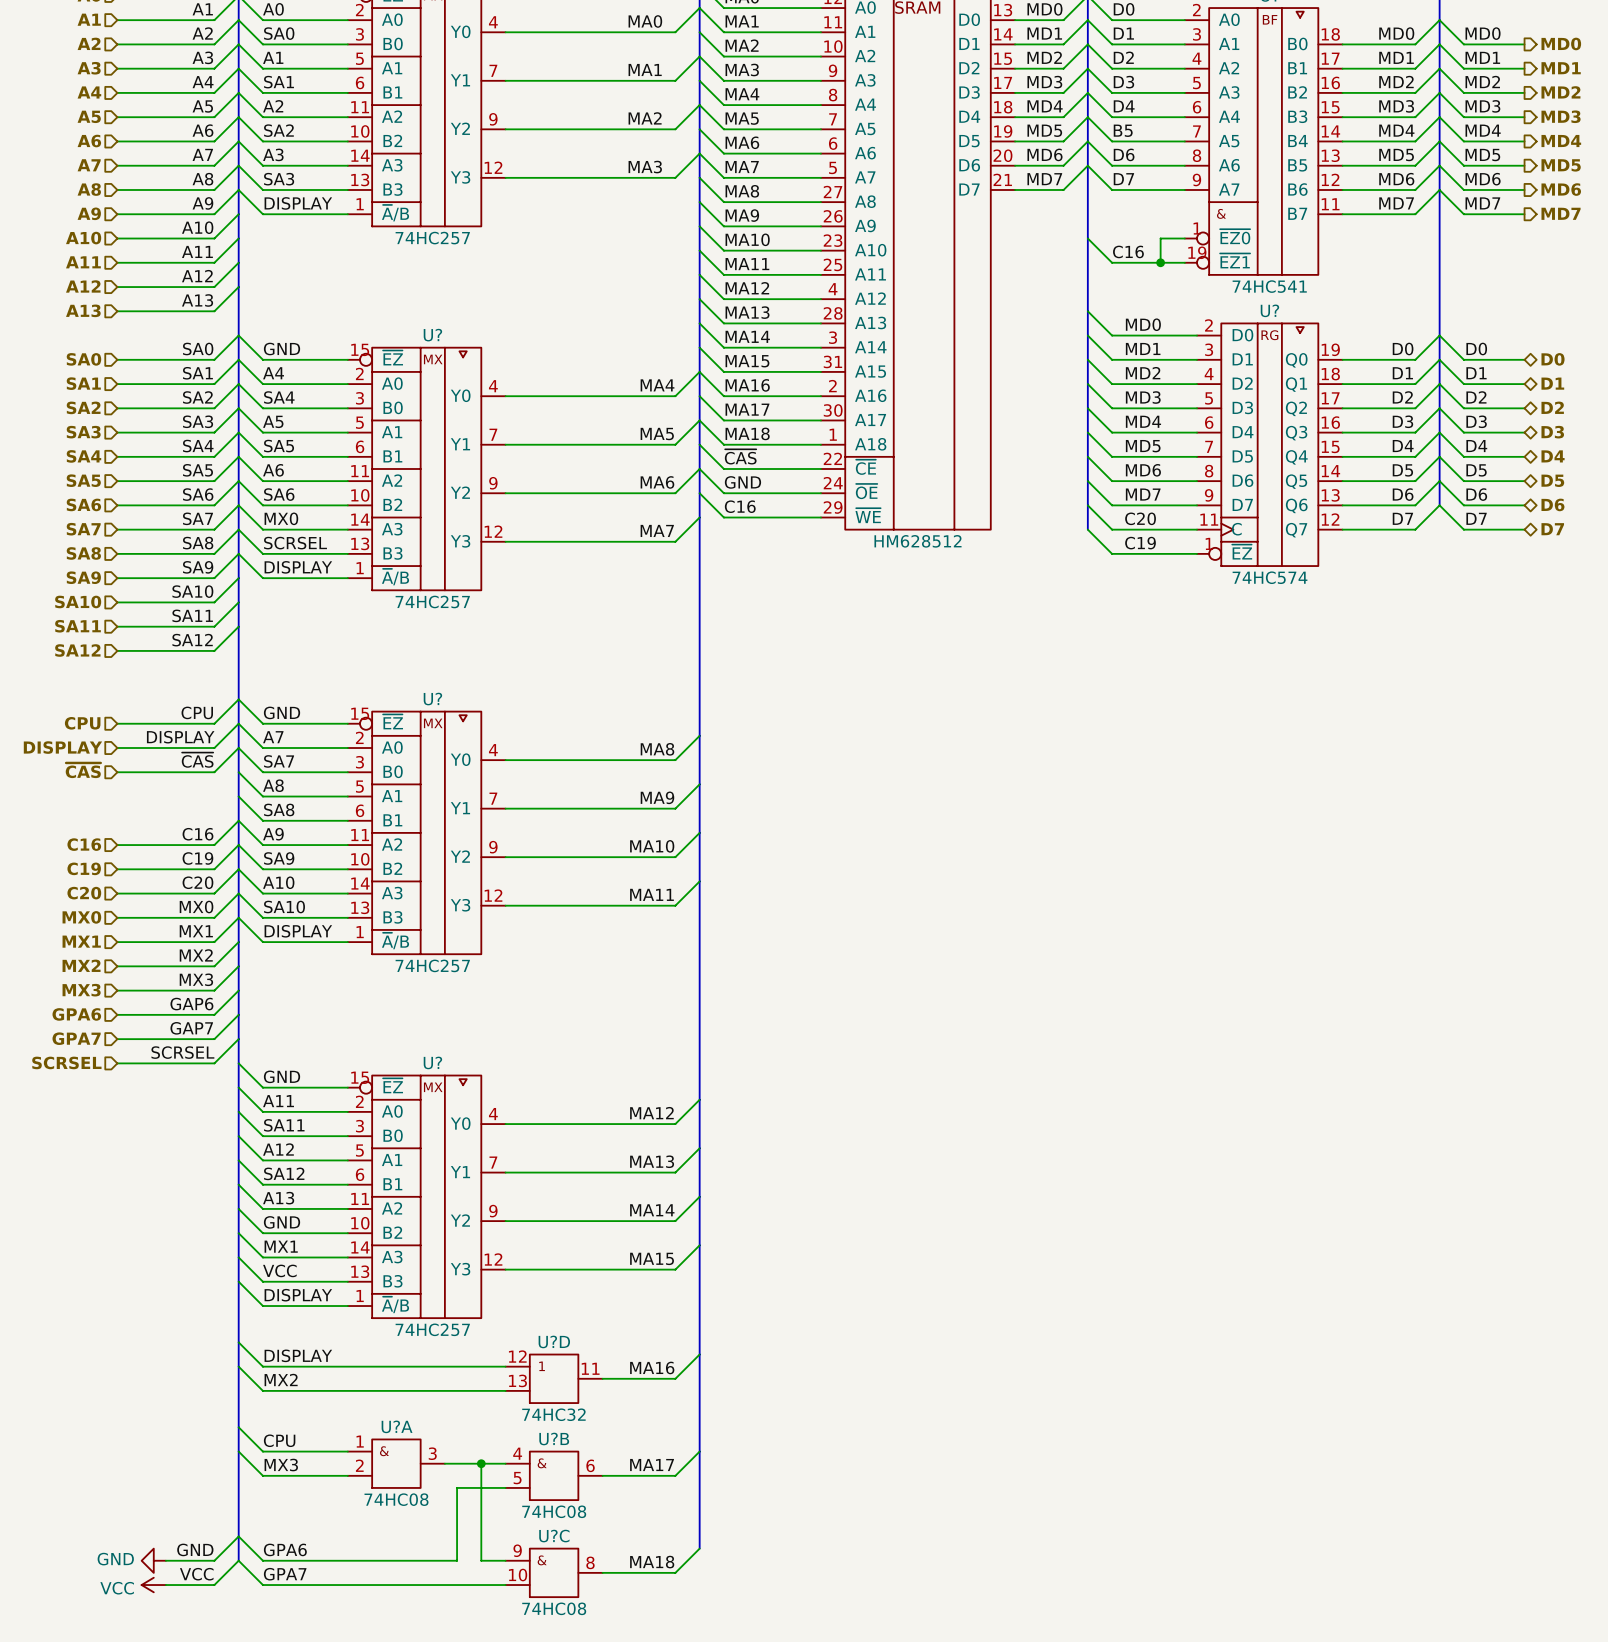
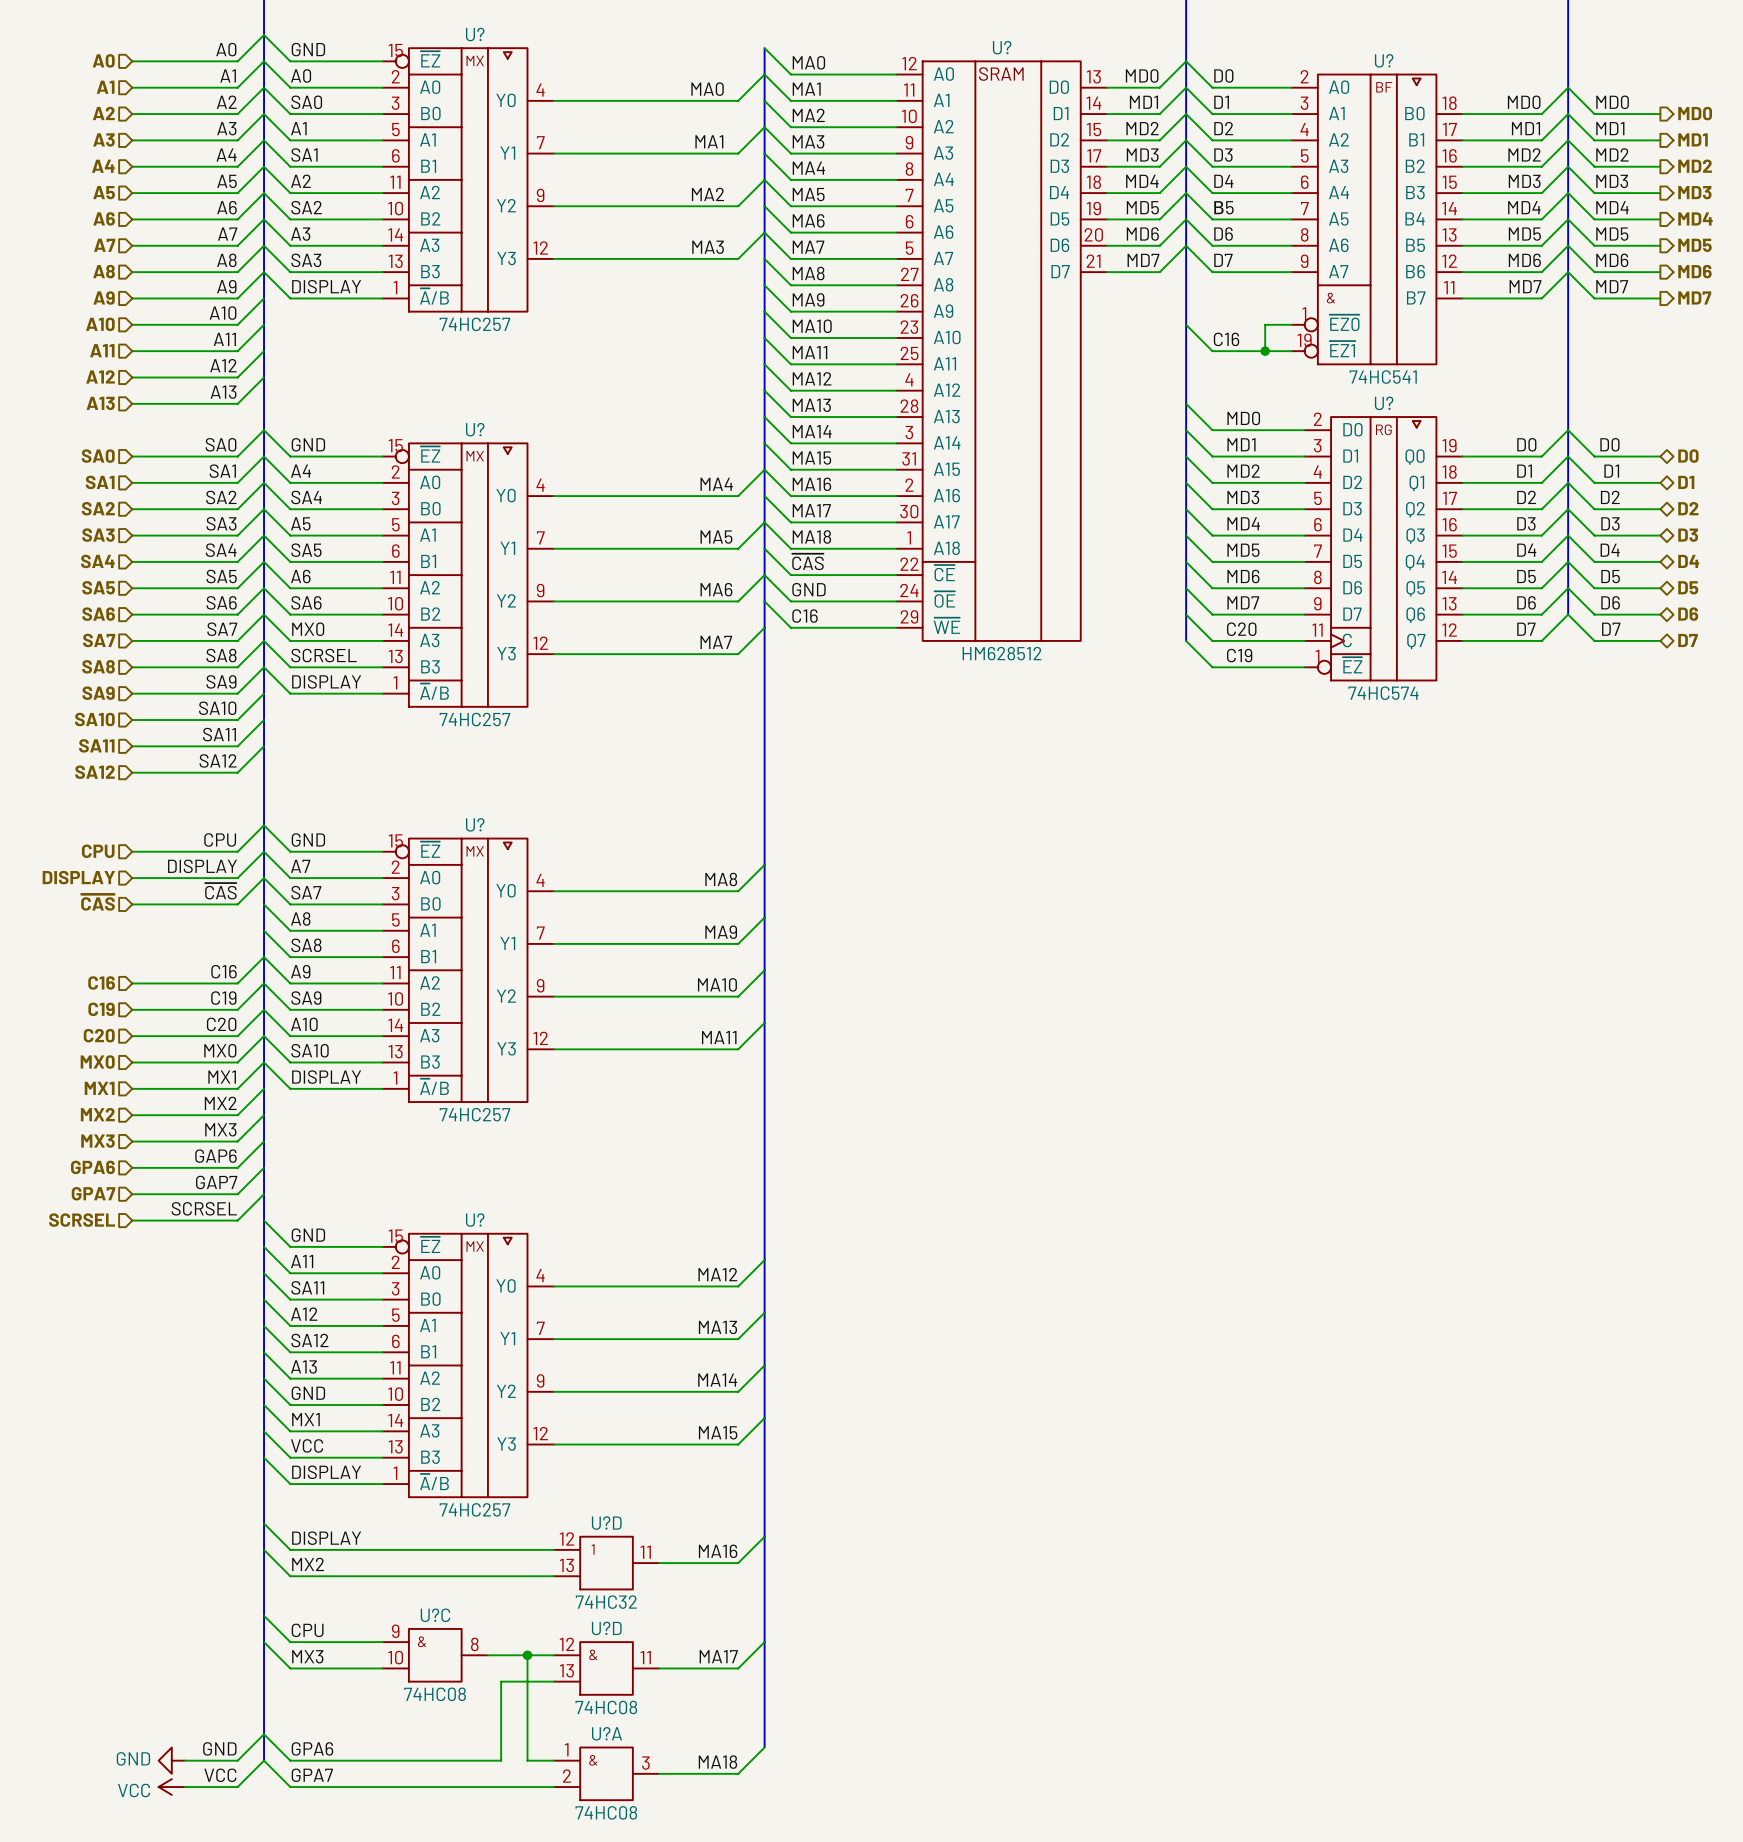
U?A name: U?A (397, 1426) -> U?C (435, 1615)
U?B name: U?B (554, 1439) -> U?D (606, 1628)
U?A pin number: 1 (360, 1441) -> 9 (395, 1631)
U?A pin number: 3 (432, 1453) -> 8 (474, 1644)
U?B pin number: 4 (517, 1453) -> 12 (567, 1644)
U?A pin number: 2 (359, 1465) -> 10 (395, 1657)
U?B pin number: 6 (590, 1465) -> 11 (645, 1657)
U?B pin number: 5 (517, 1478) -> 13 (566, 1670)
U?C name: U?C (554, 1536) -> U?A (607, 1733)
U?C pin number: 9 (517, 1550) -> 1 (566, 1749)
U?C pin number: 8 (590, 1562) -> 3 (645, 1763)
U?C pin number: 10 (518, 1575) -> 2 (567, 1776)

